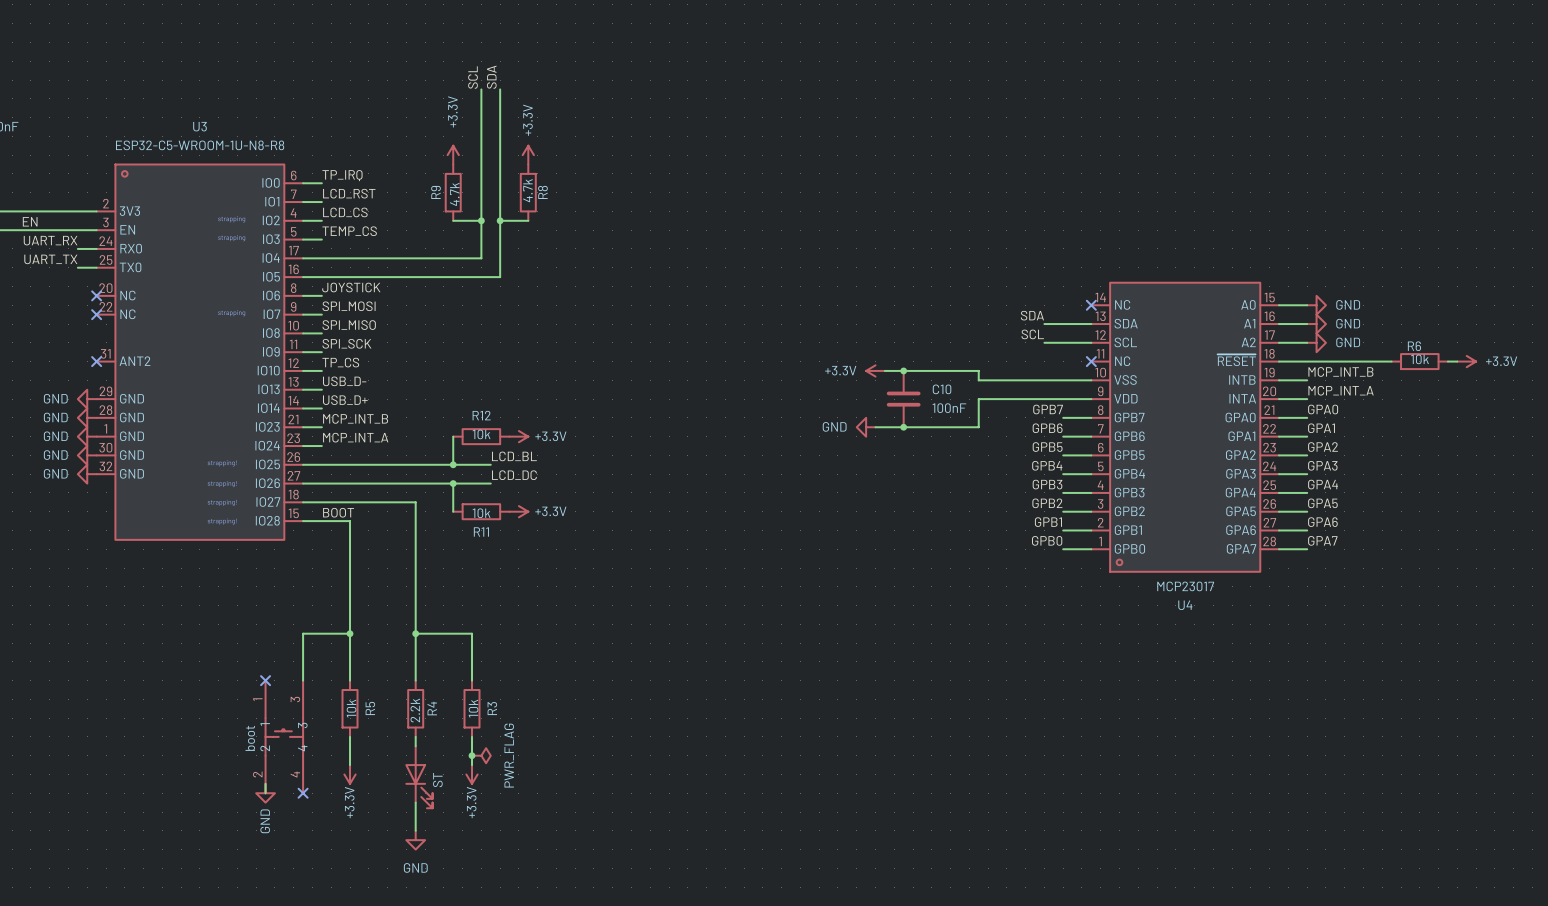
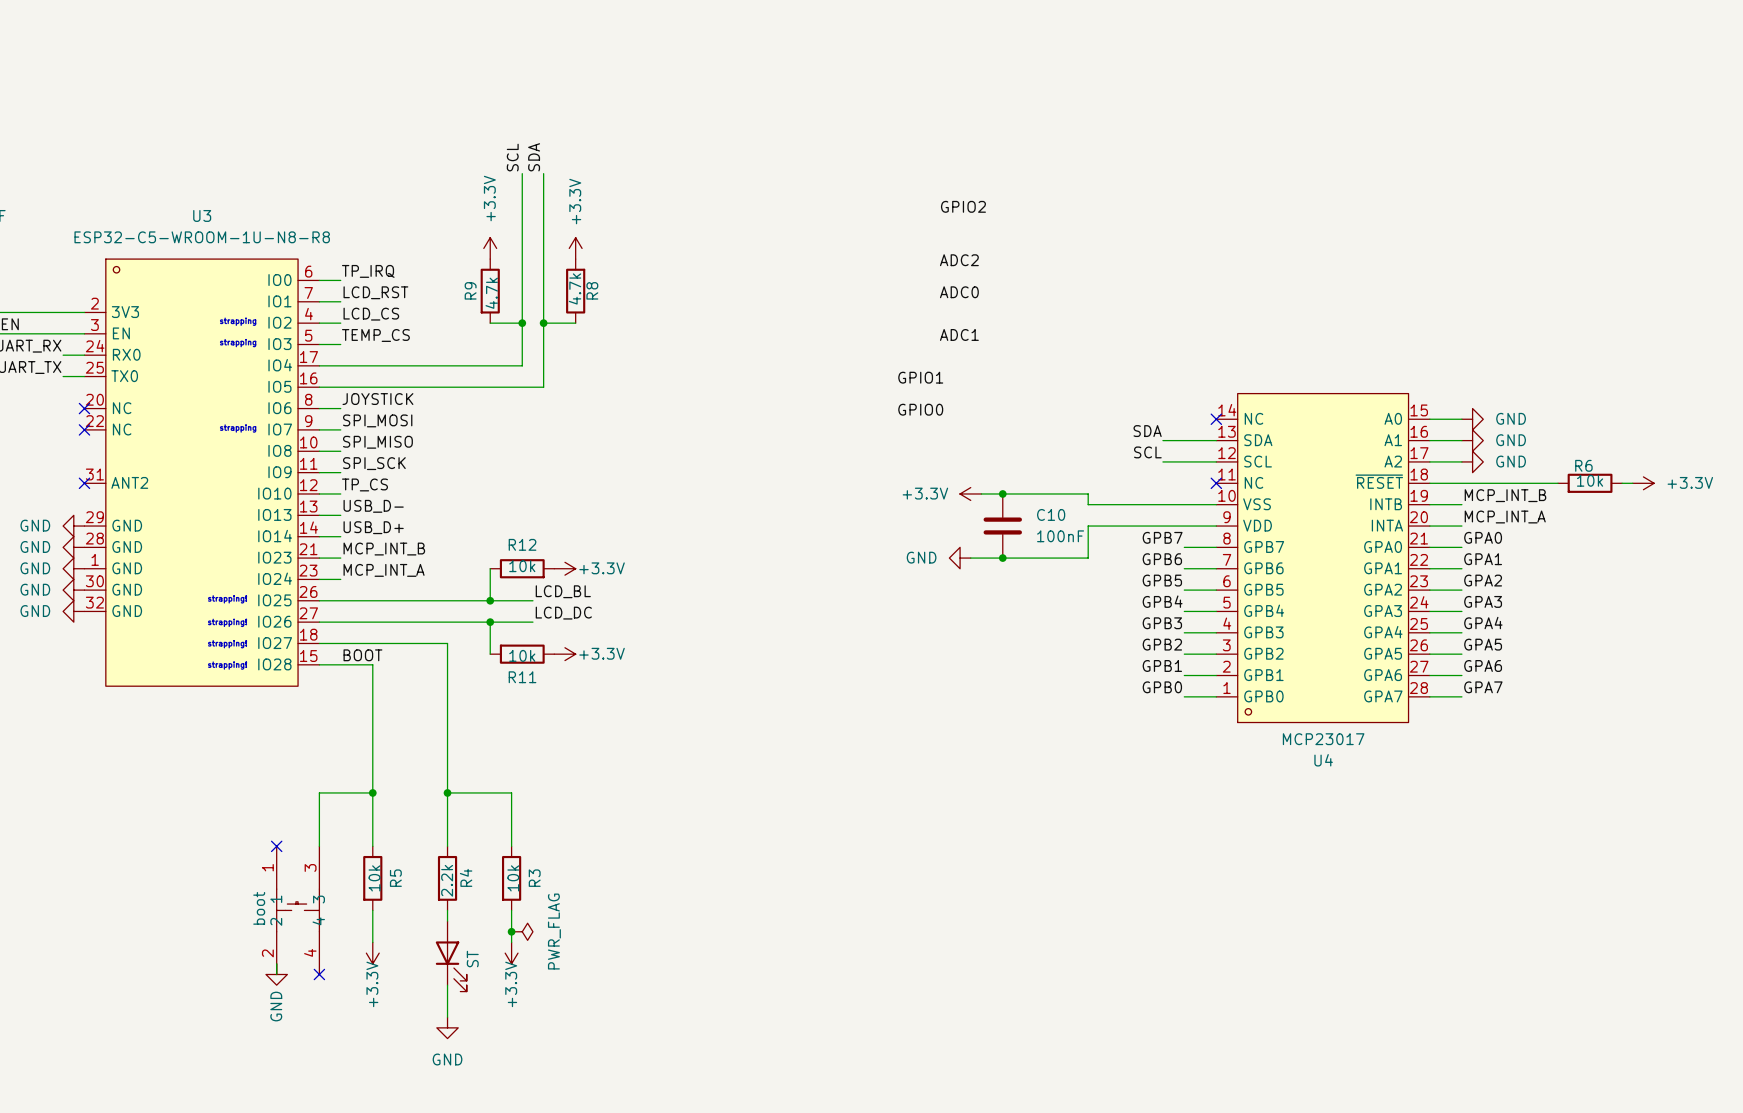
label: none -> GPIO2 (963, 206)
label: none -> ADC2 (959, 260)
label: none -> ADC0 (959, 292)
label: none -> ADC1 (959, 334)
label: none -> GPIO1 (920, 377)
label: none -> GPIO0 (920, 409)

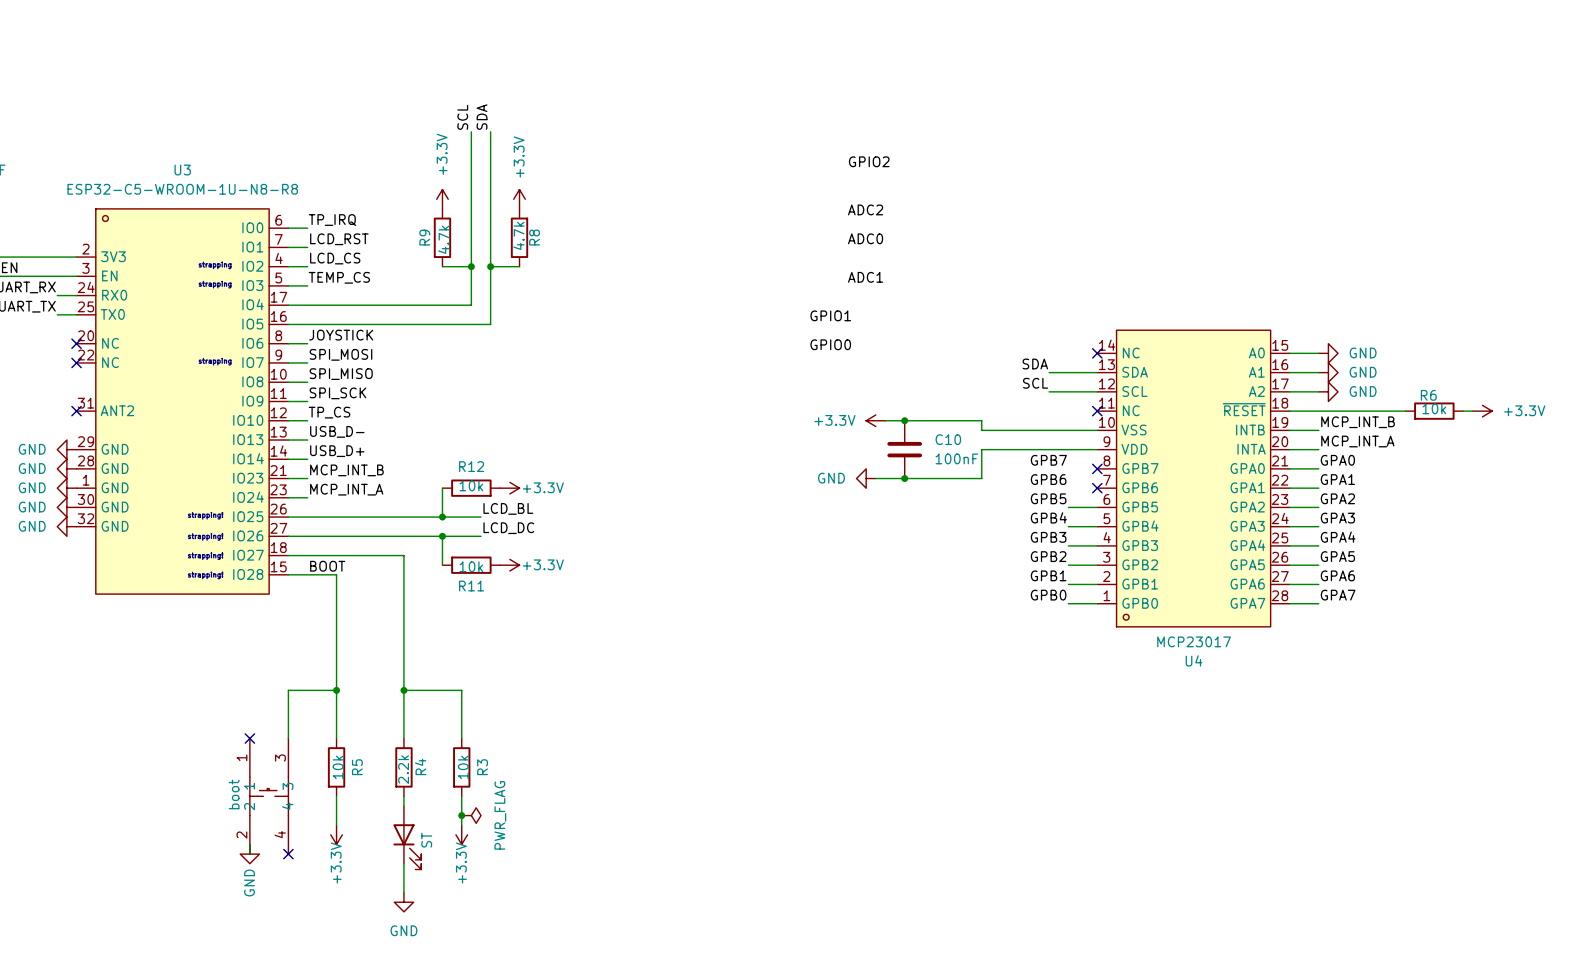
wire: (1184, 547) (1216, 547) -> none
no-connect mark: none -> (1097, 468)
wire: (1184, 568) (1216, 568) -> none
no-connect mark: none -> (1097, 488)

